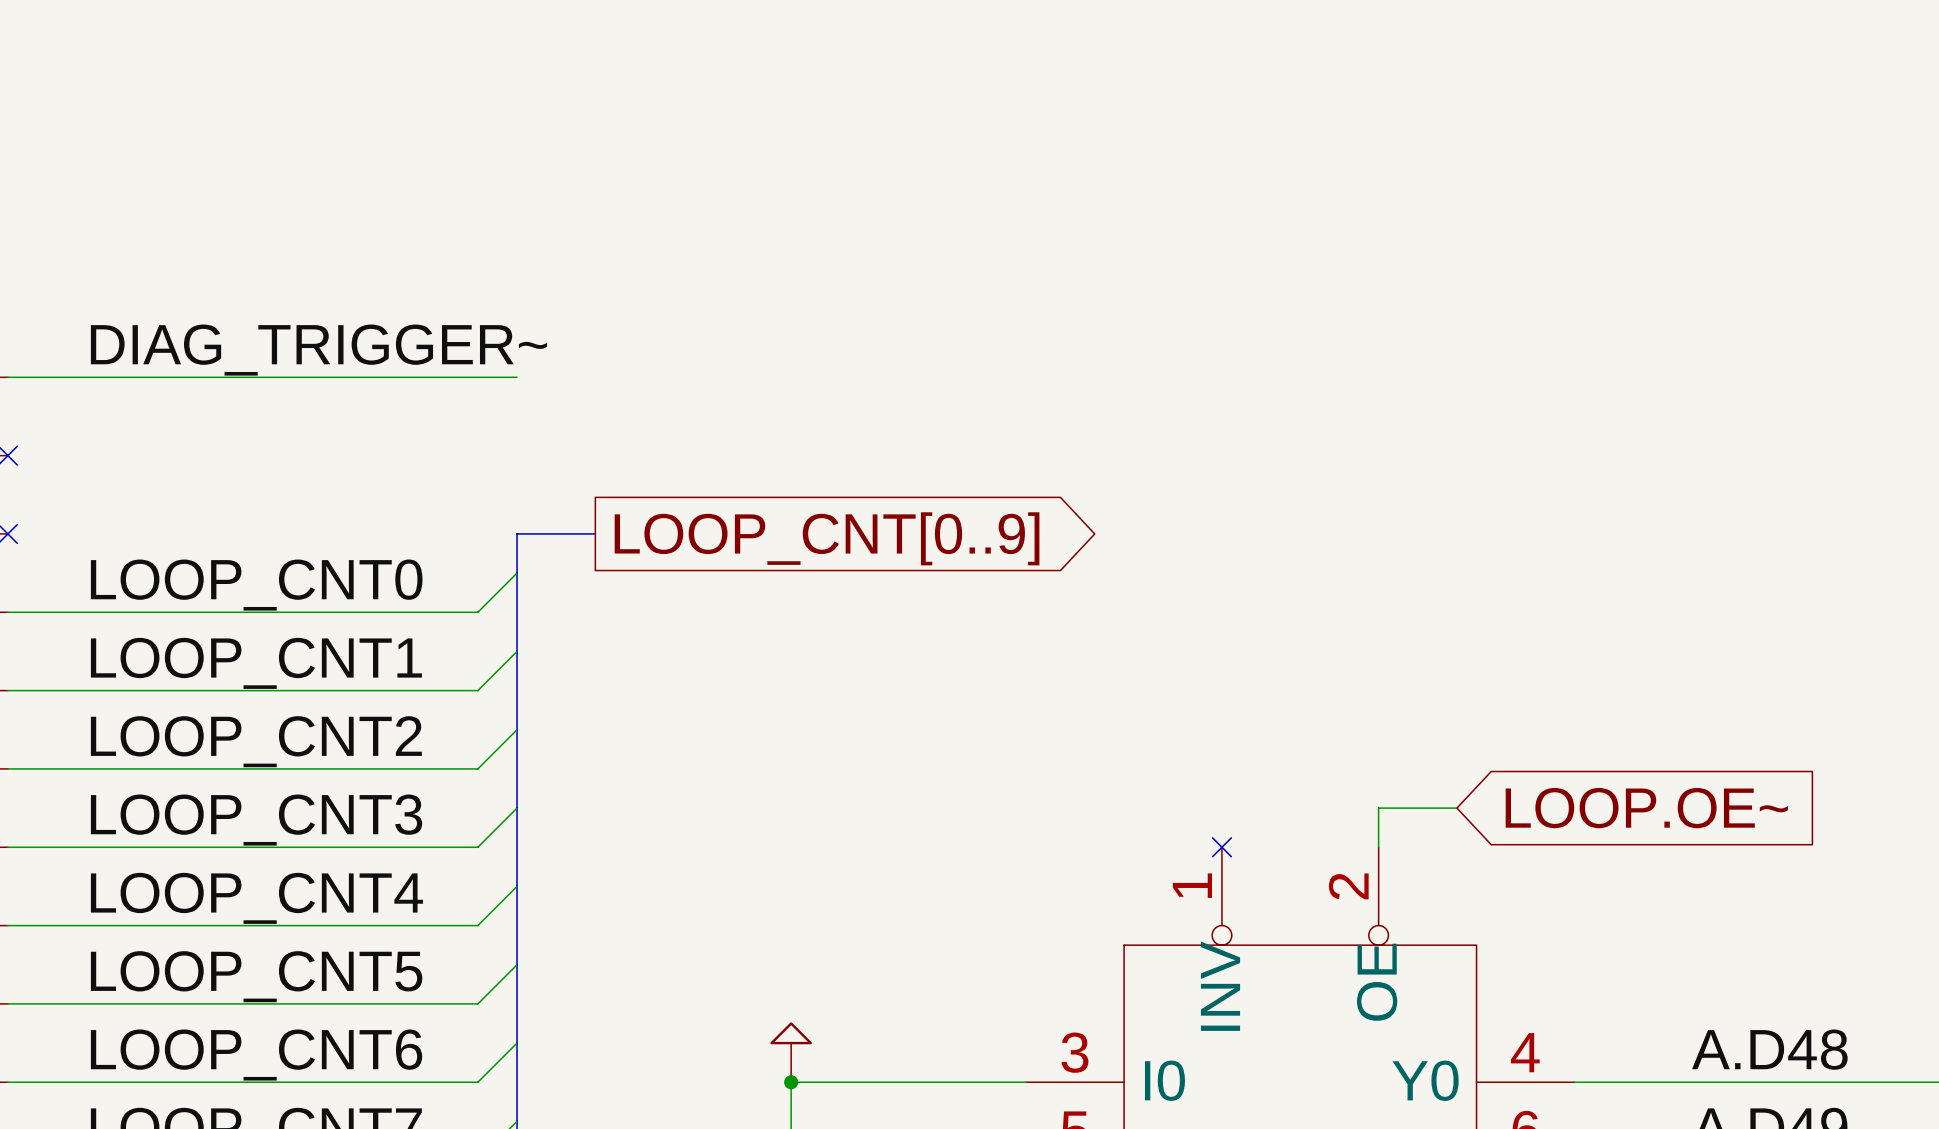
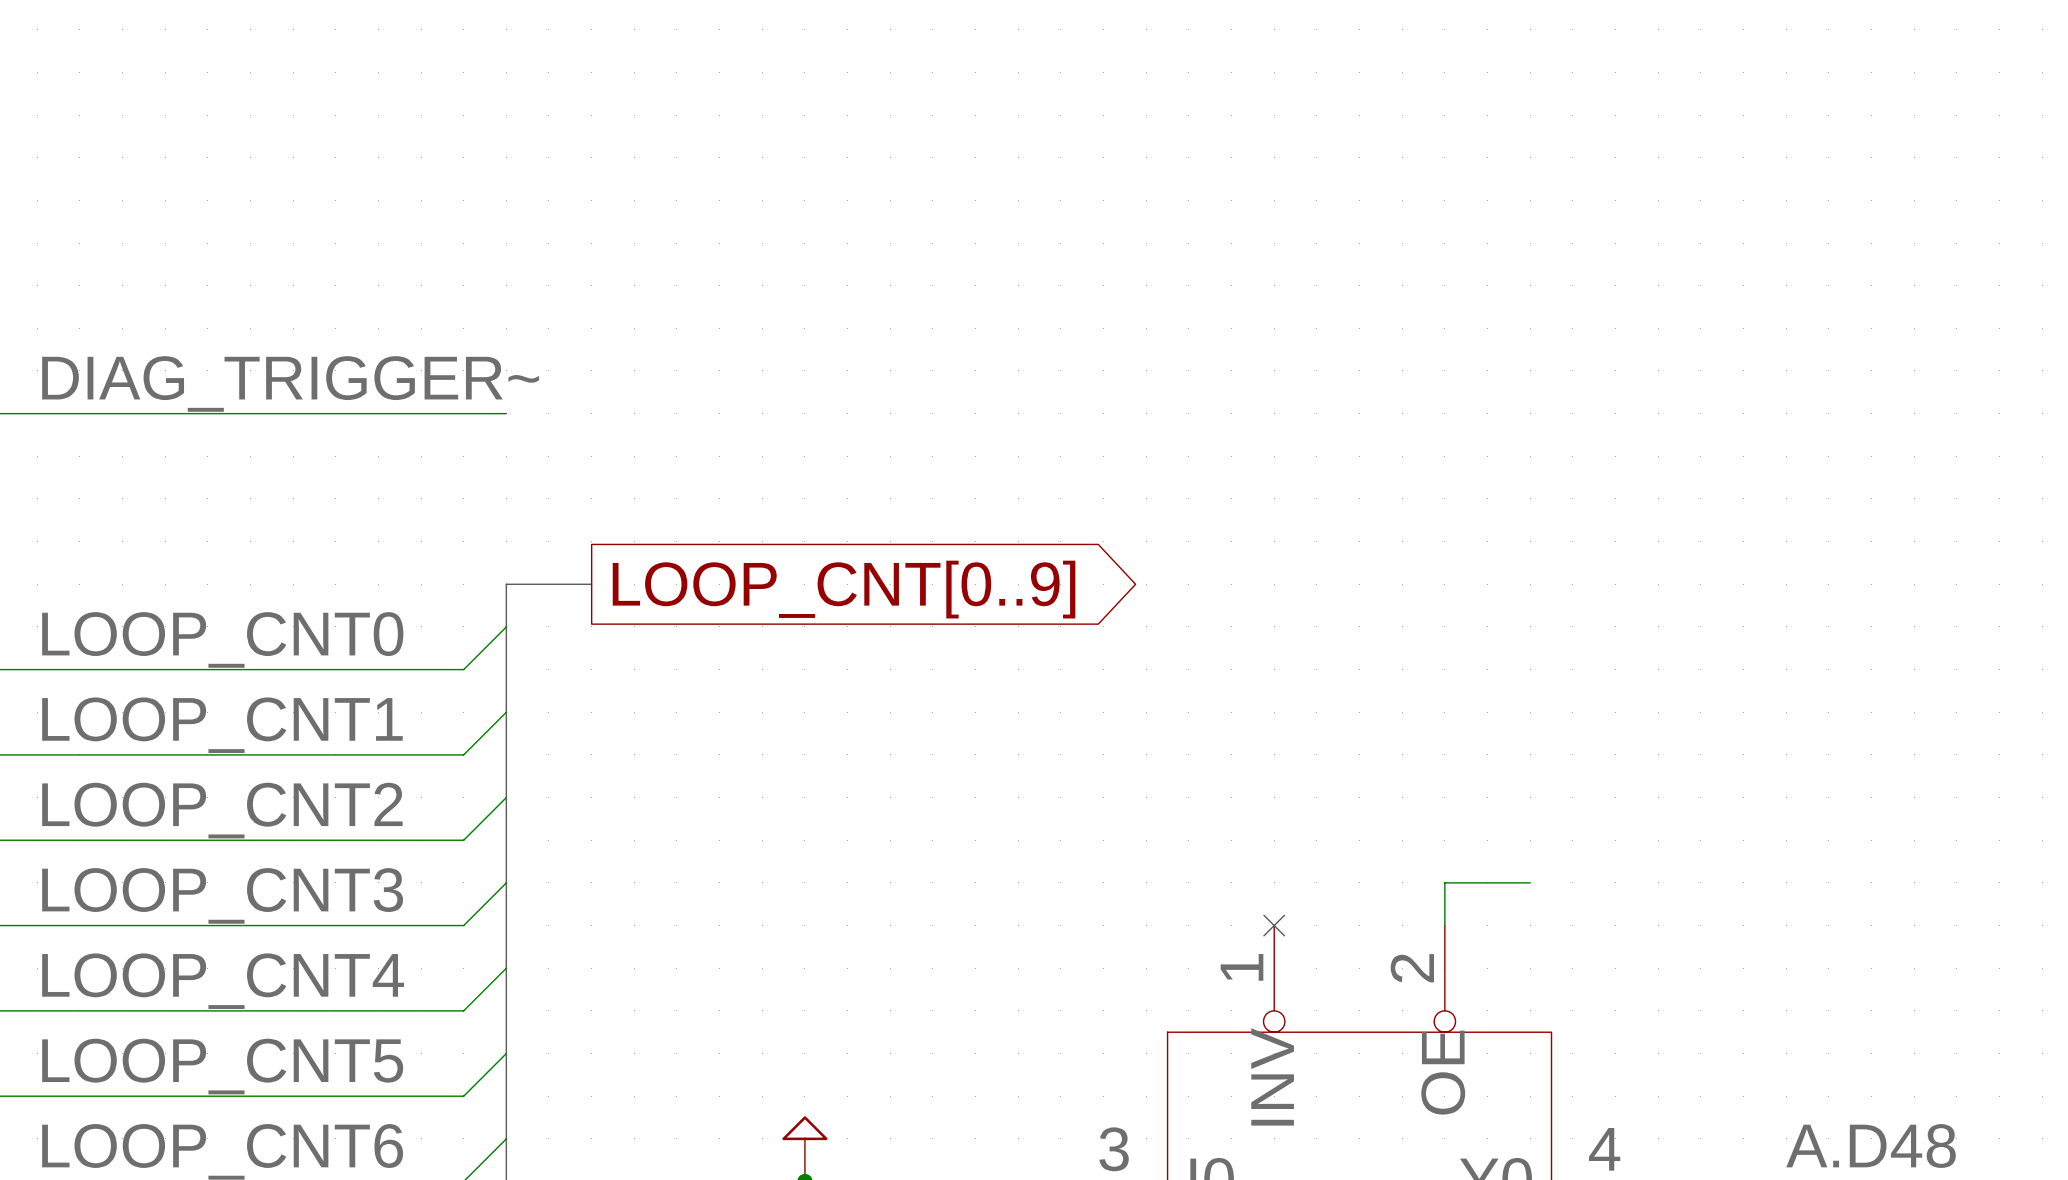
global label: LOOP.OE~ (1646, 808) -> none

